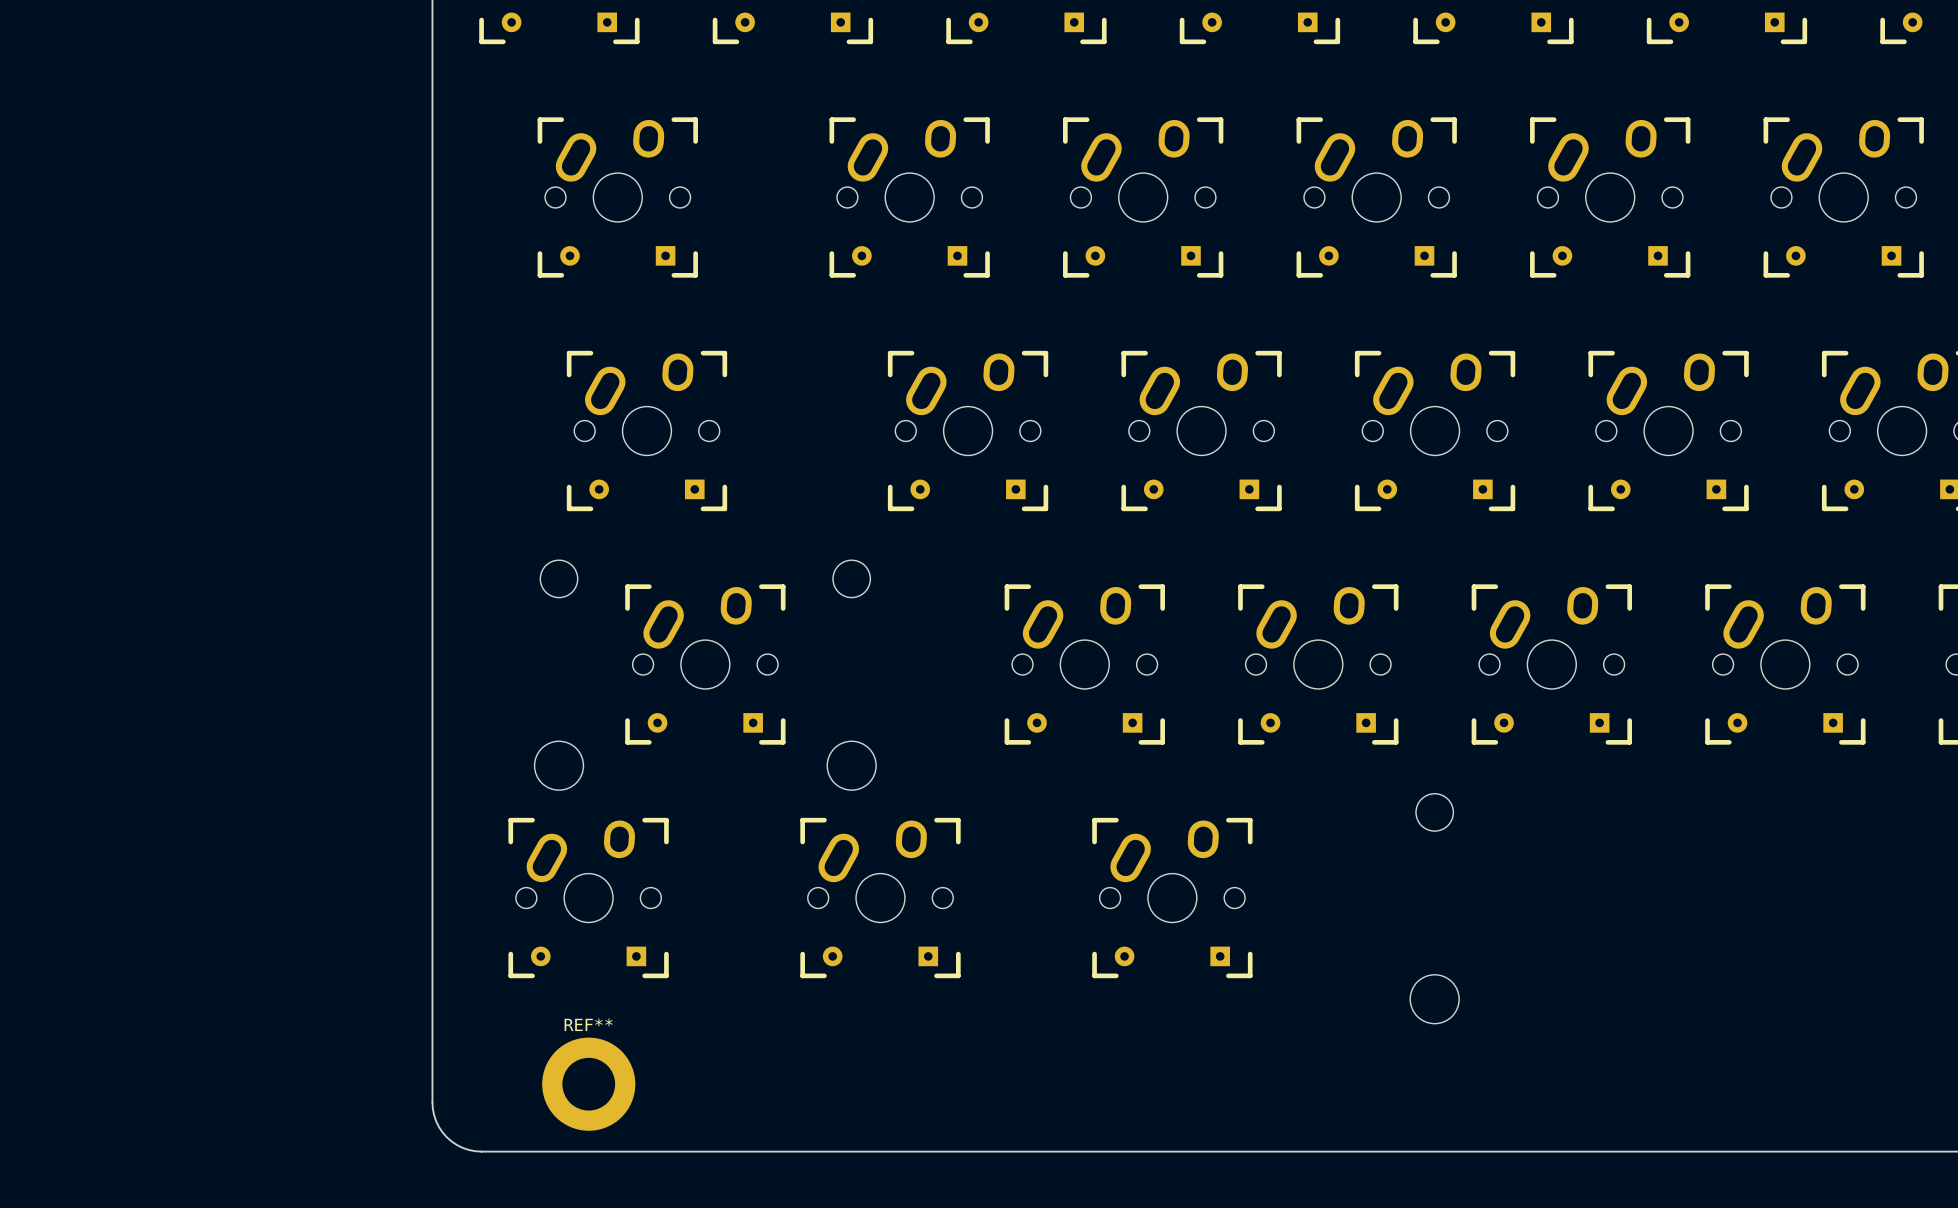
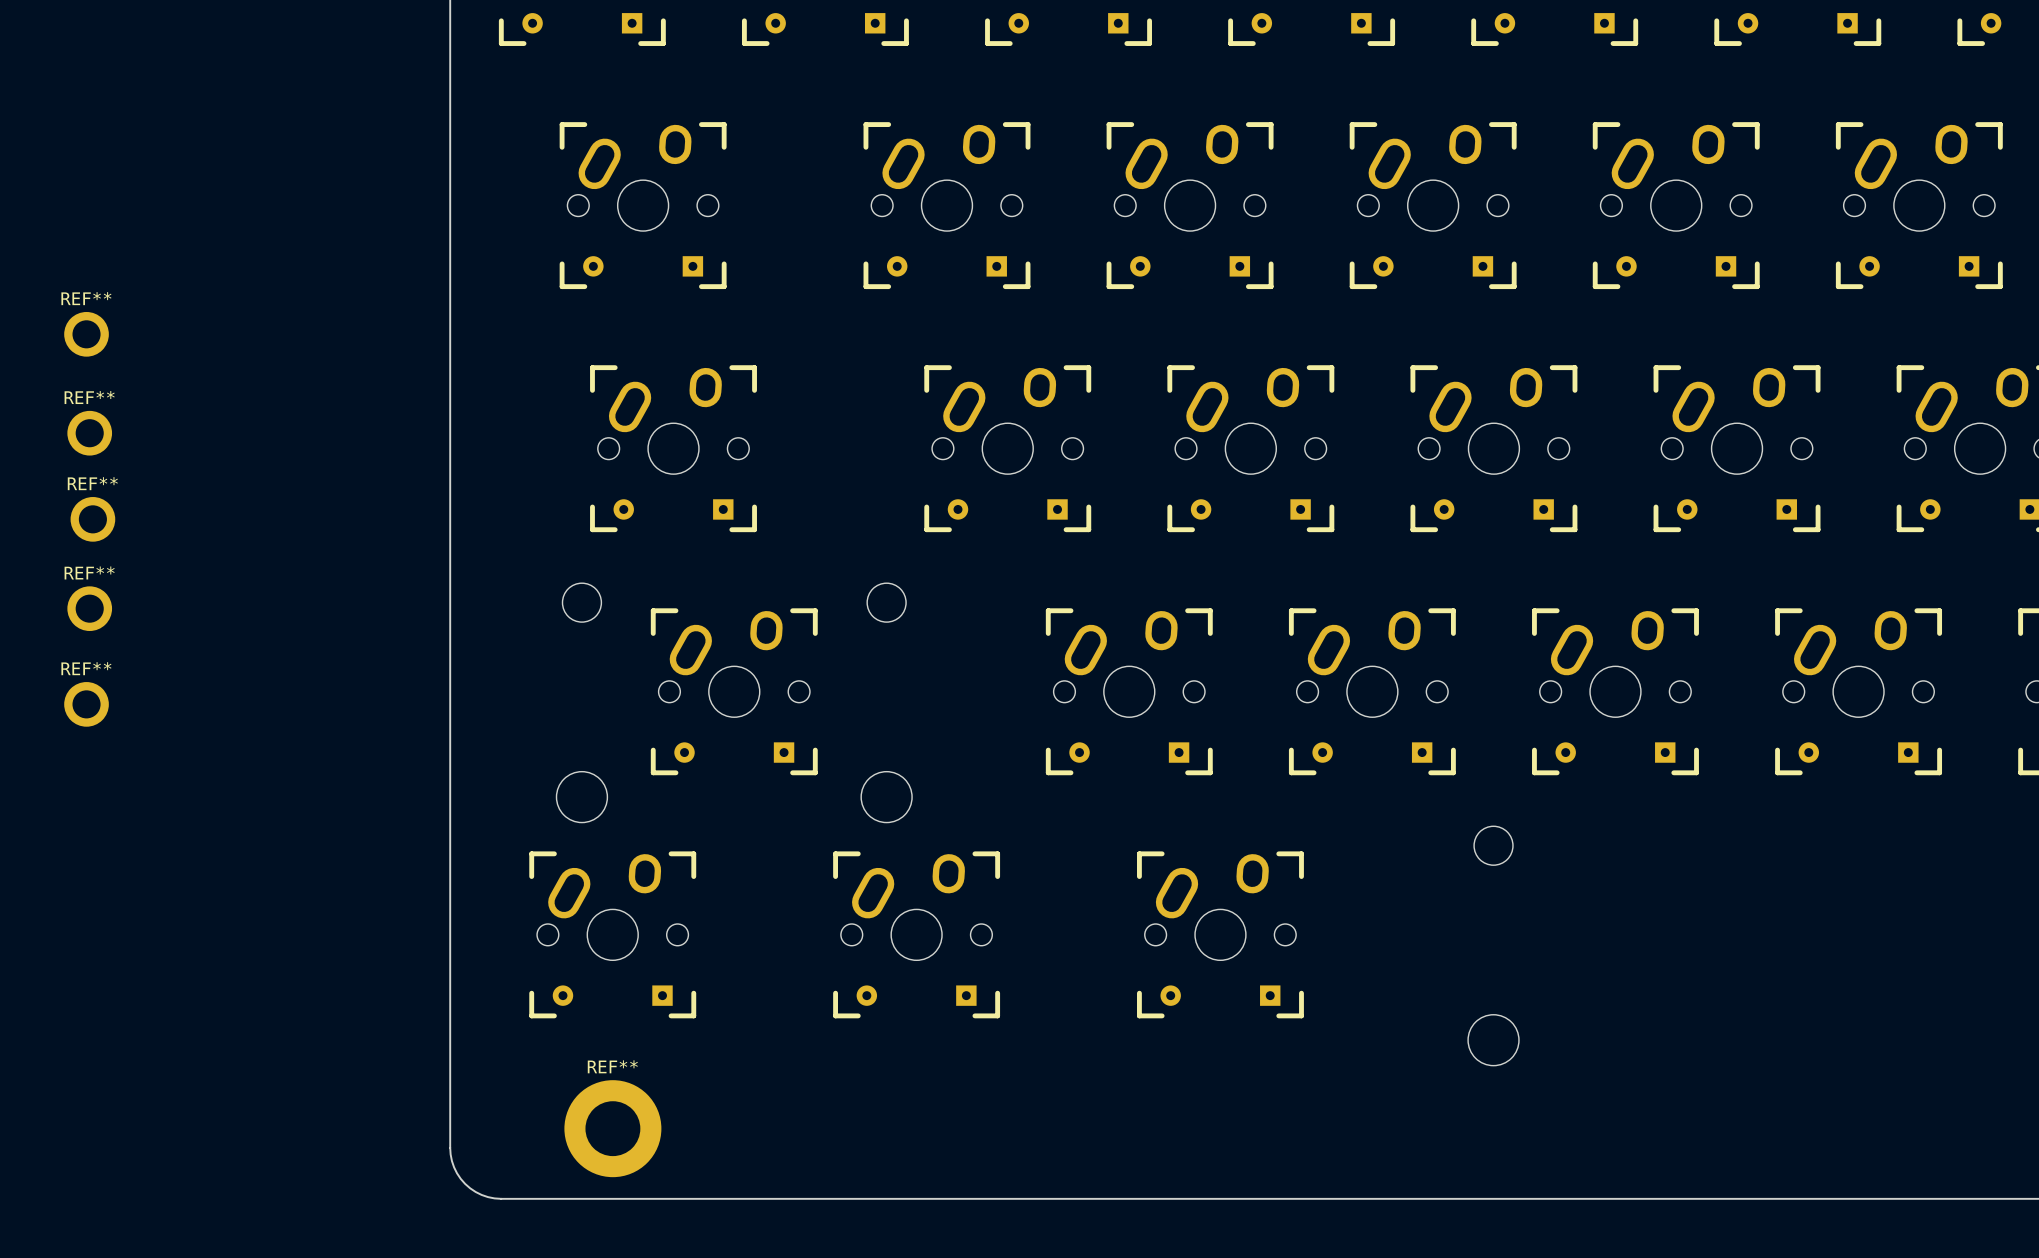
REF**: none -> (86, 334)
REF**: none -> (89, 433)
REF**: none -> (92, 519)
REF**: none -> (89, 608)
REF**: none -> (86, 704)

